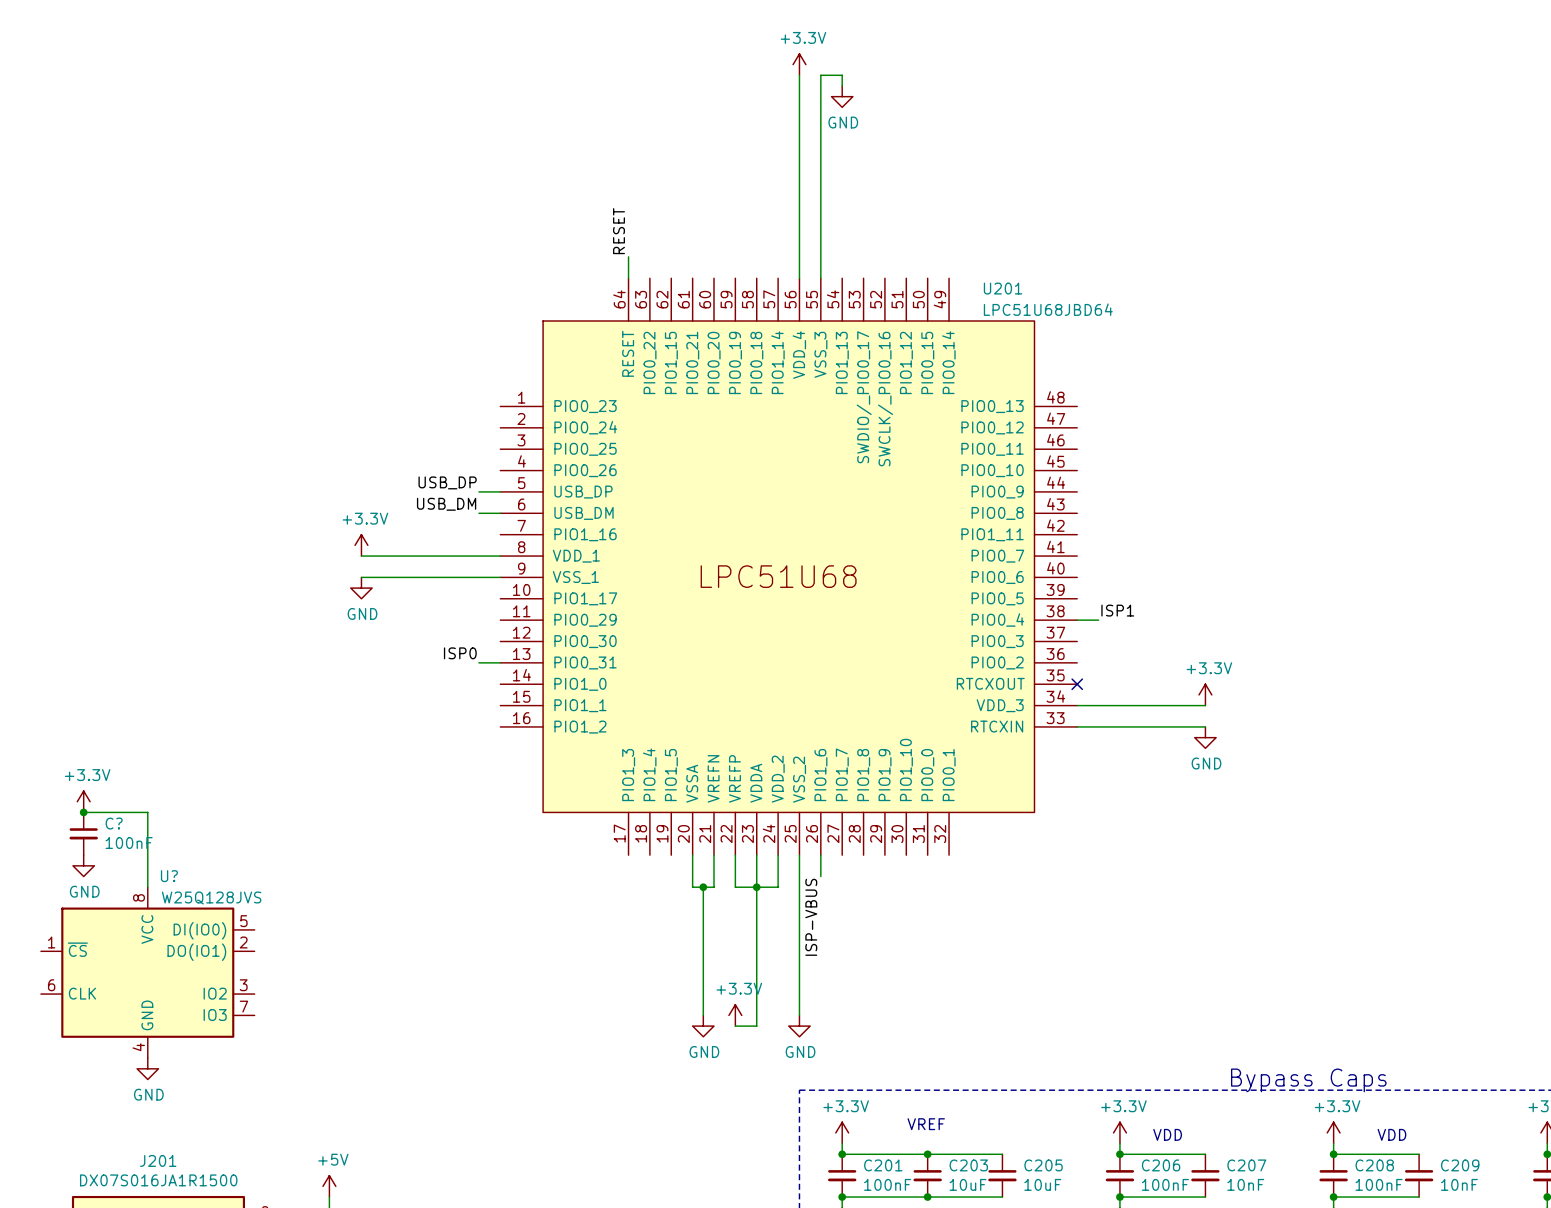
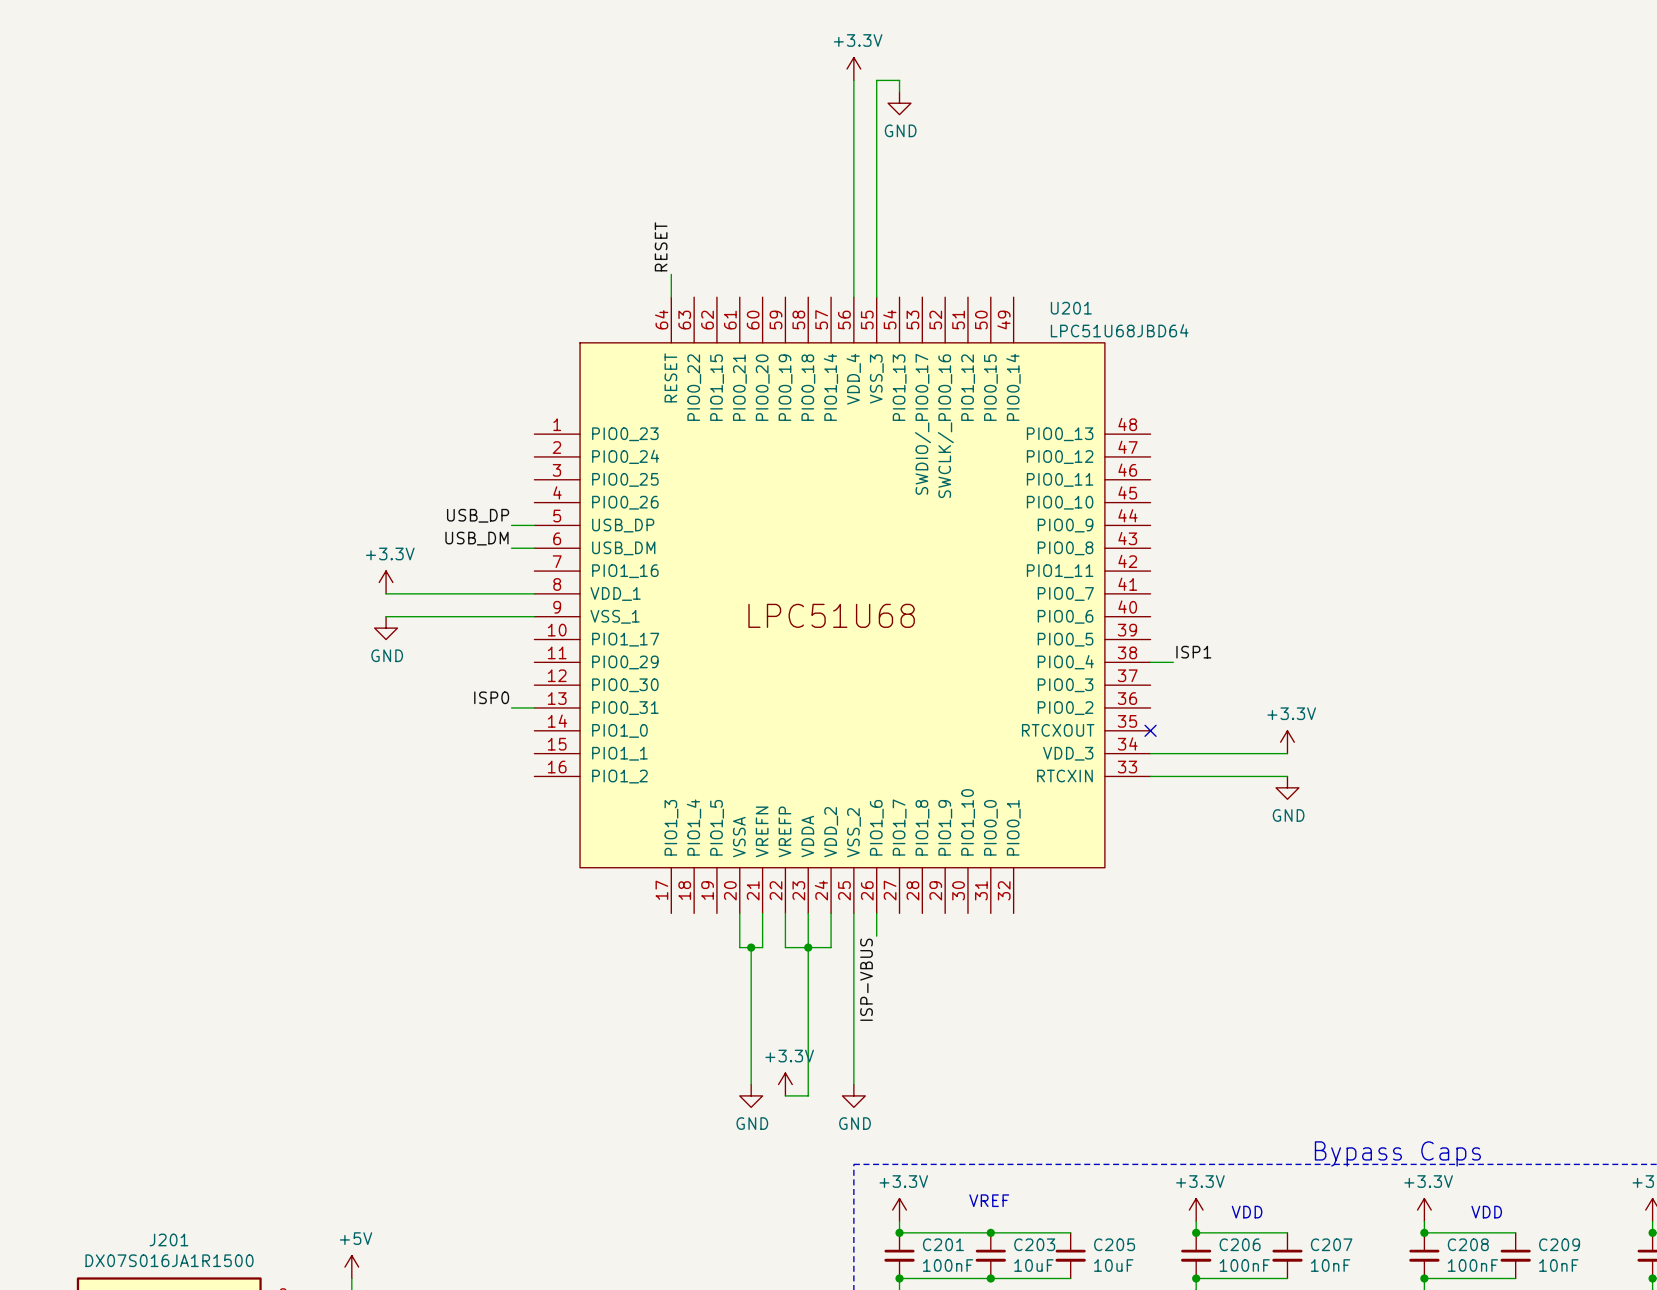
power symbol: +3.3V (83, 801) -> none
wire: (83, 812) (147, 812) (147, 887) -> none
junction: (83, 812) -> none
C?: 100nF (83, 833) -> none
power symbol: GND (83, 865) -> none
U?: W25Q128JVS (147, 972) -> none
power symbol: GND (147, 1068) -> none

